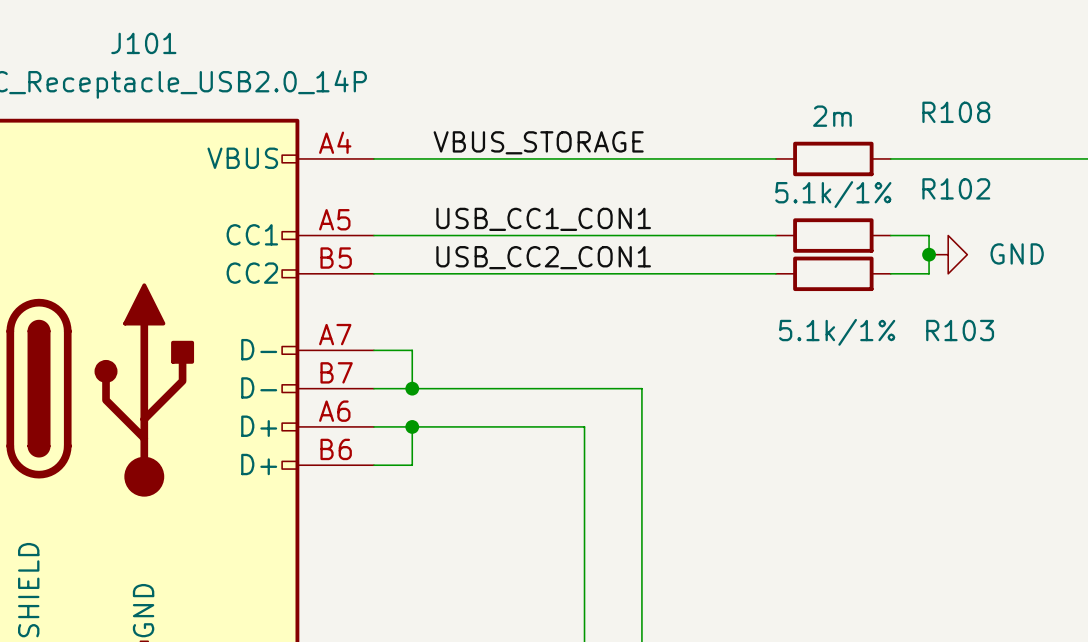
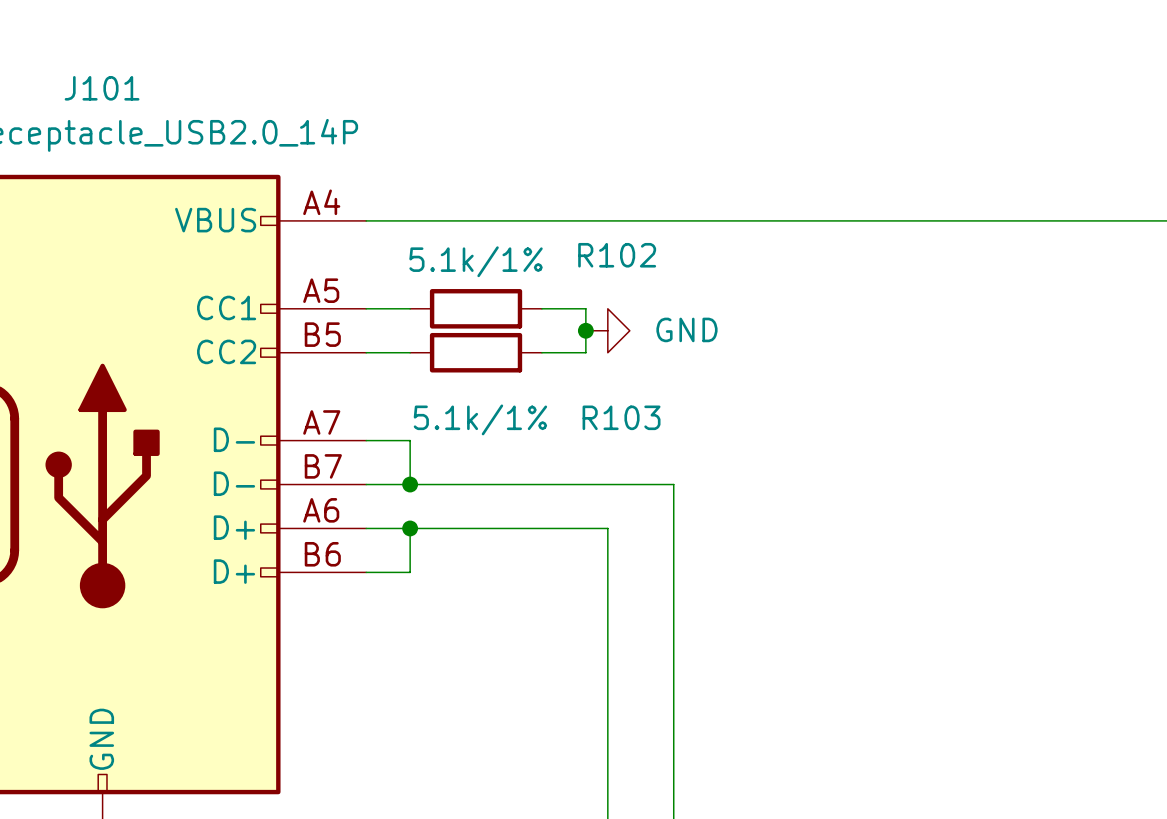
label: VBUS_STORAGE (538, 142) -> none
R108: 2m (833, 158) -> none
label: USB_CC1_CON1 (543, 219) -> none
wire: (412, 235) (527, 235) -> (827, 220) (959, 220)
wire: (565, 235) (775, 235) -> (585, 308) (585, 352)
R102 position: (833, 235) -> (476, 308)
wire: (890, 235) (929, 235) (929, 273) (890, 273) -> none
junction: none -> (585, 330)
junction: (929, 254) -> none
power symbol position: GND (948, 254) -> GND (607, 330)
label: USB_CC2_CON1 (543, 257) -> none
wire: (412, 273) (527, 273) -> none
wire: (565, 273) (775, 273) -> none
R103 position: (833, 273) -> (476, 352)

